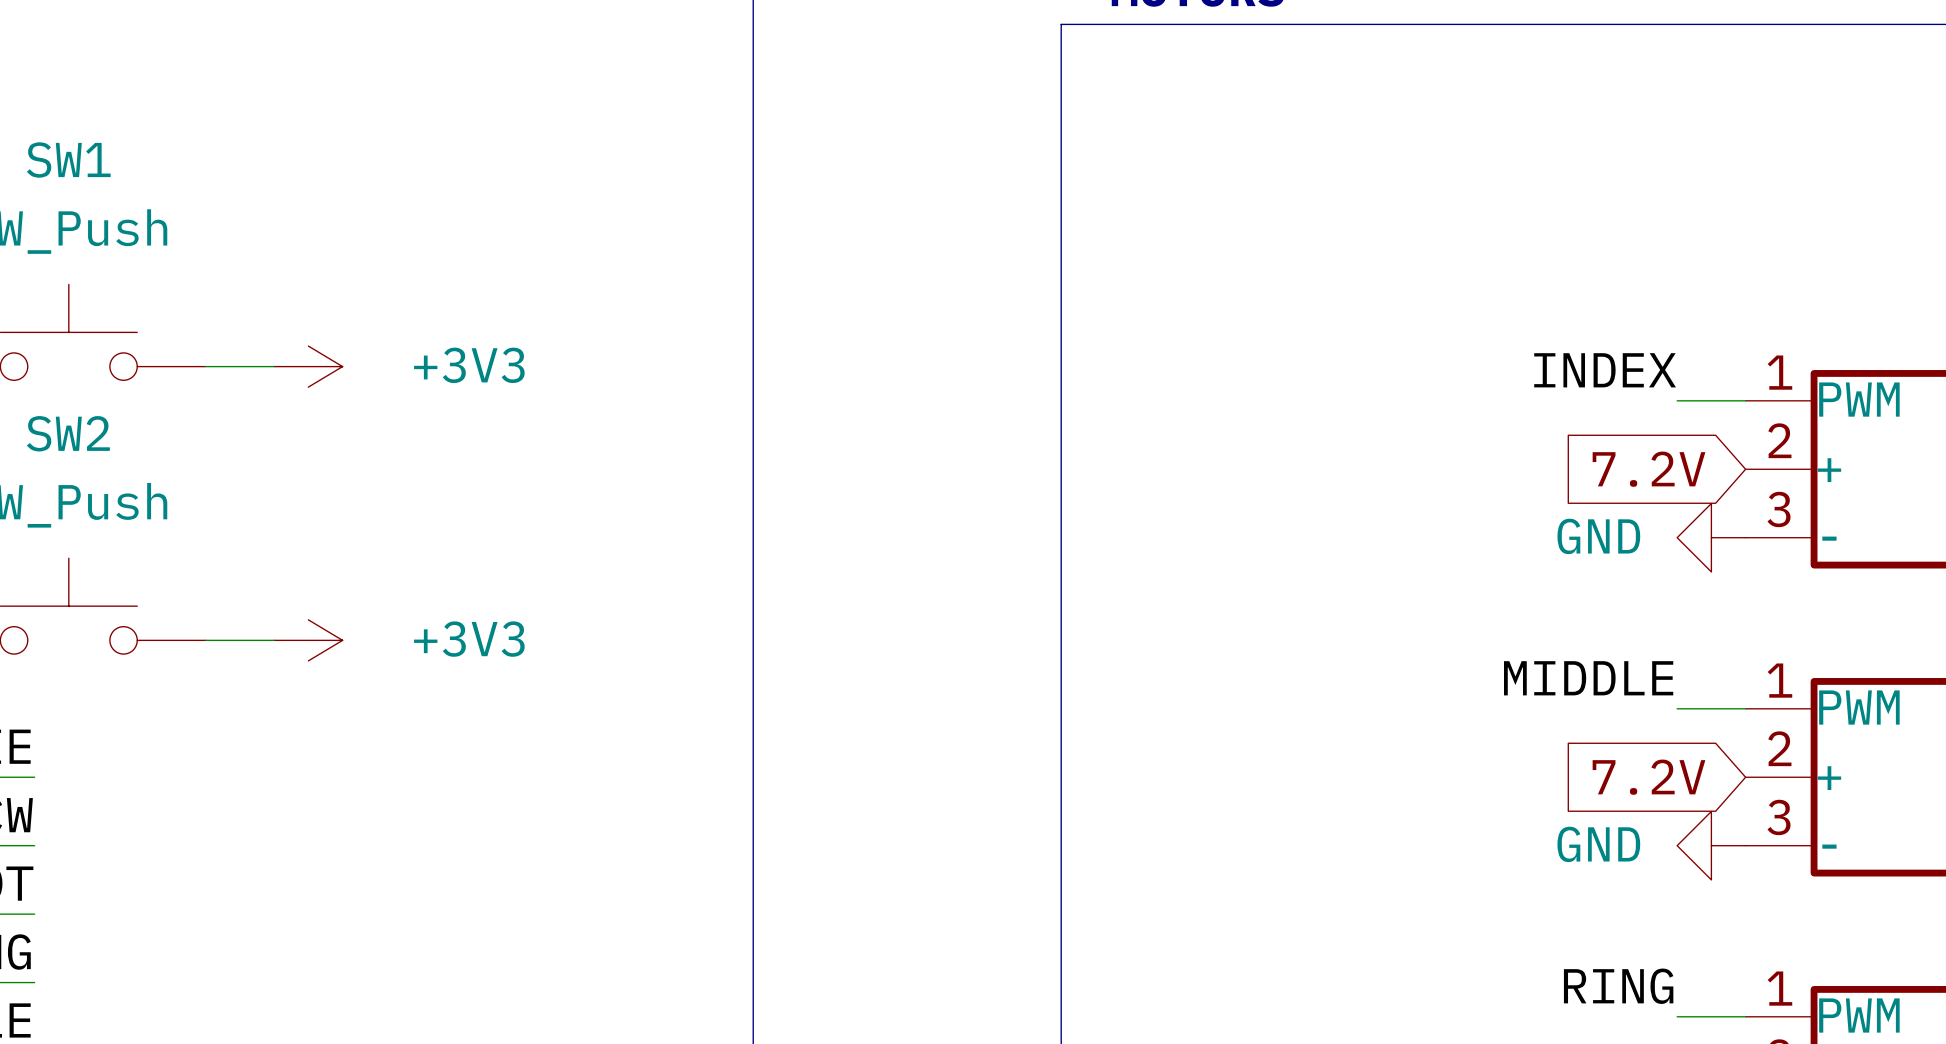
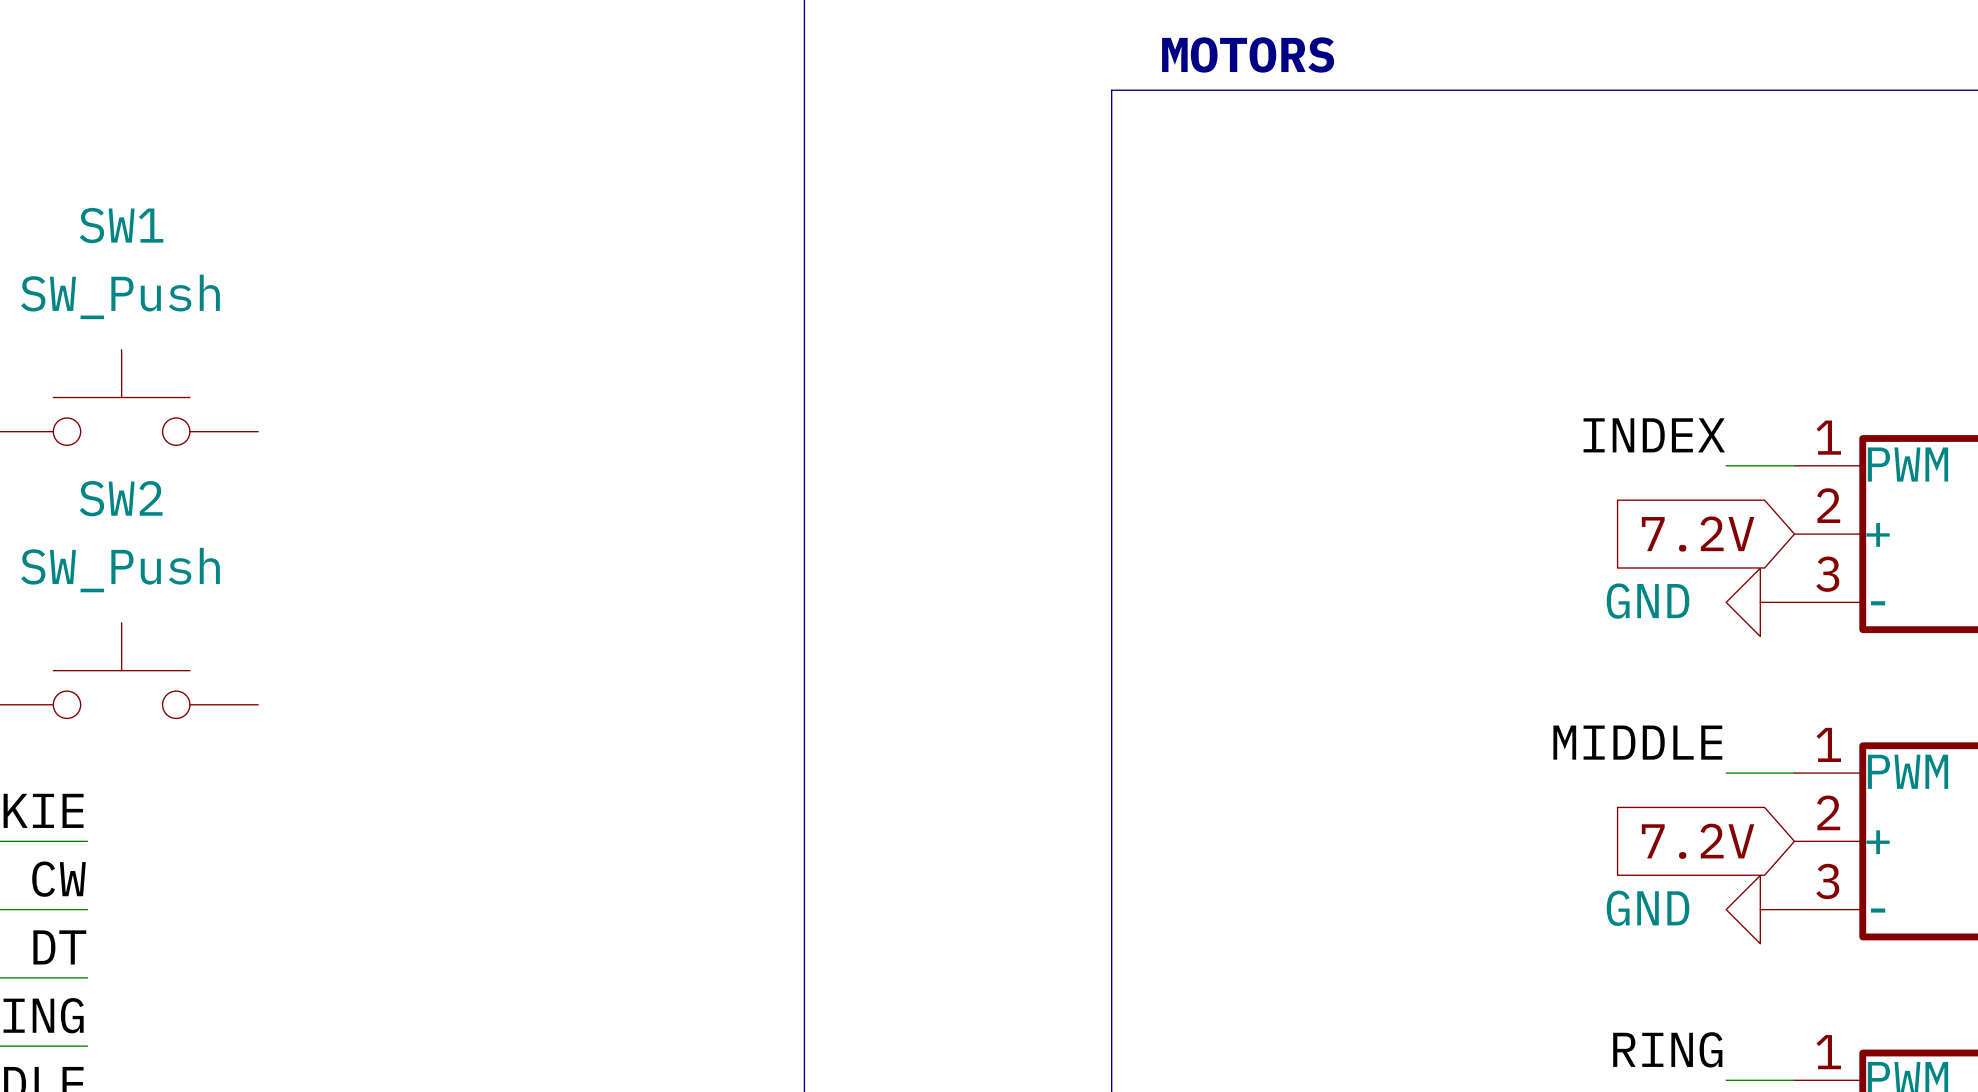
wire: (205, 366) (274, 366) -> none
power symbol: +3V3 (308, 366) -> none
wire: (205, 640) (274, 640) -> none
power symbol: +3V3 (308, 640) -> none

